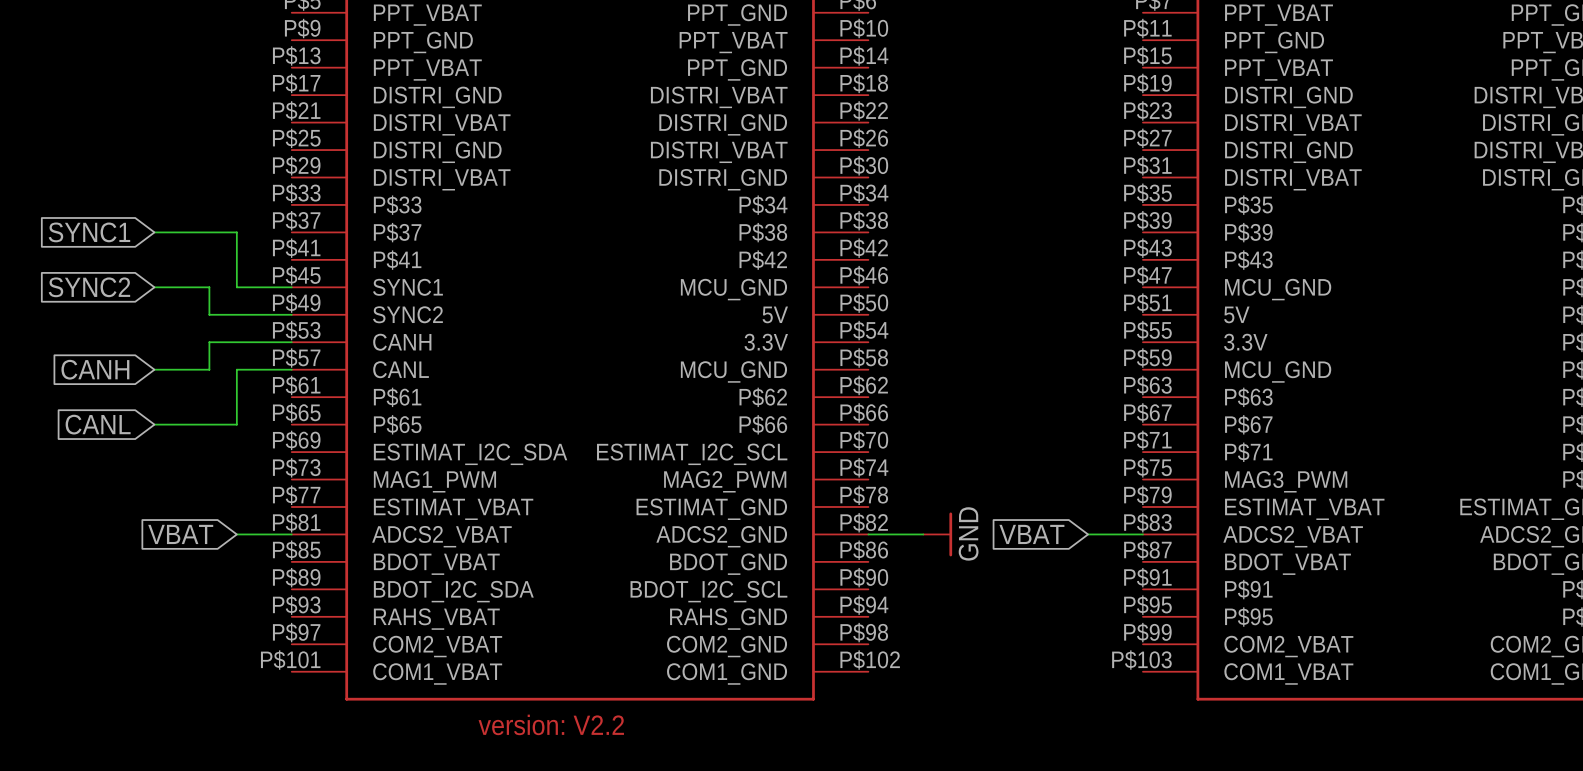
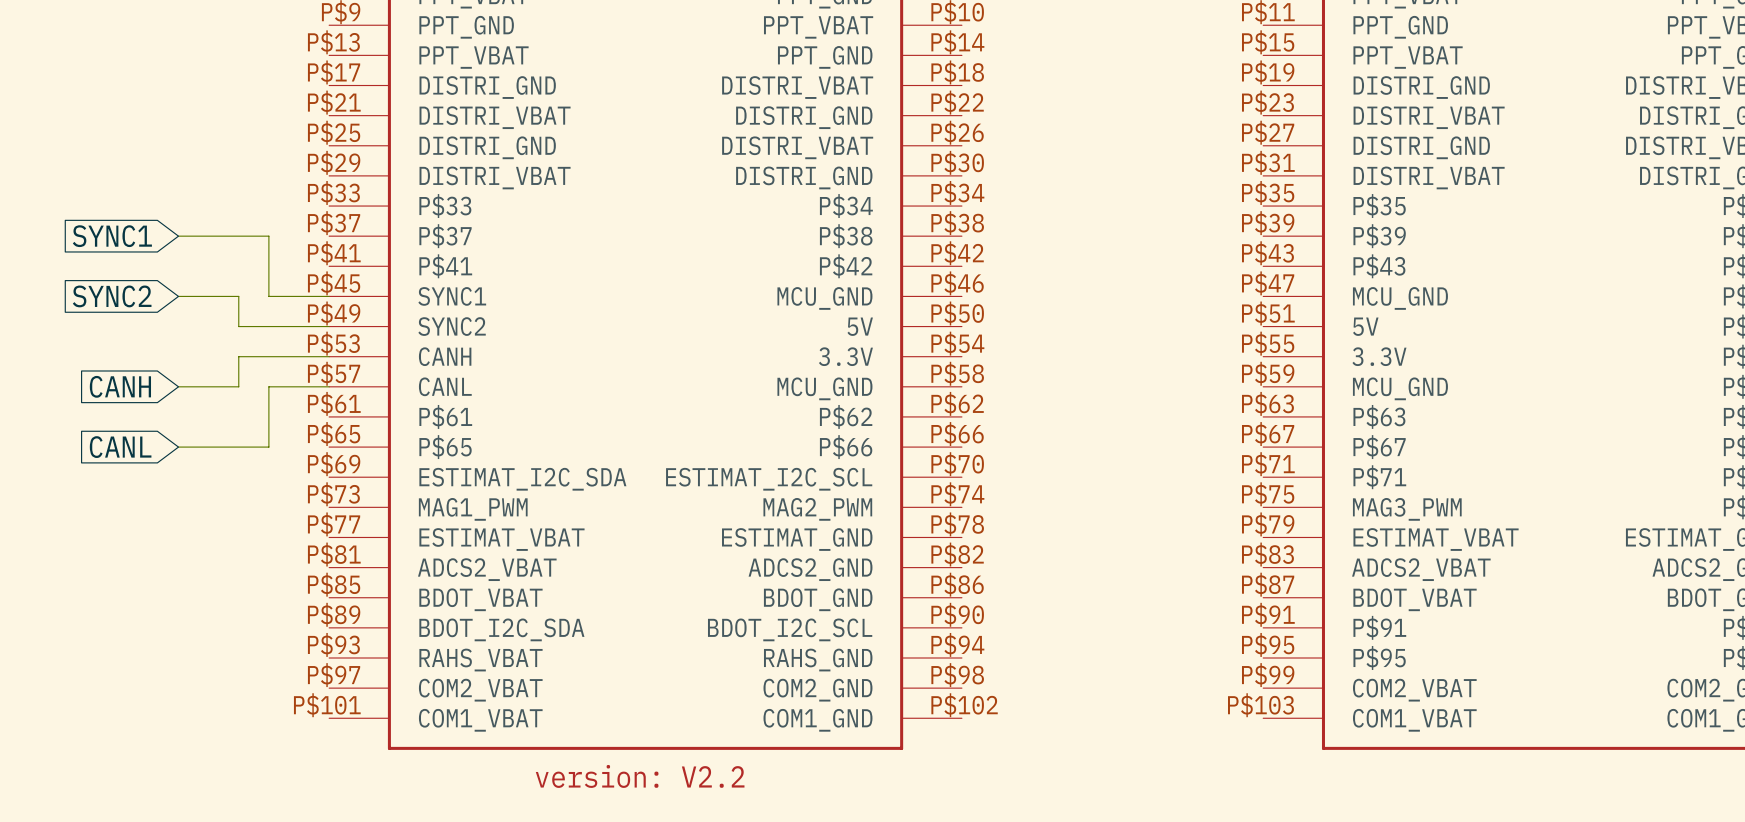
global label: VBAT (180, 534) -> none
wire: (236, 534) (291, 534) -> none
wire: (868, 534) (923, 534) -> none
power symbol: GND (937, 534) -> none
global label: VBAT (1031, 534) -> none
wire: (1088, 534) (1142, 534) -> none

